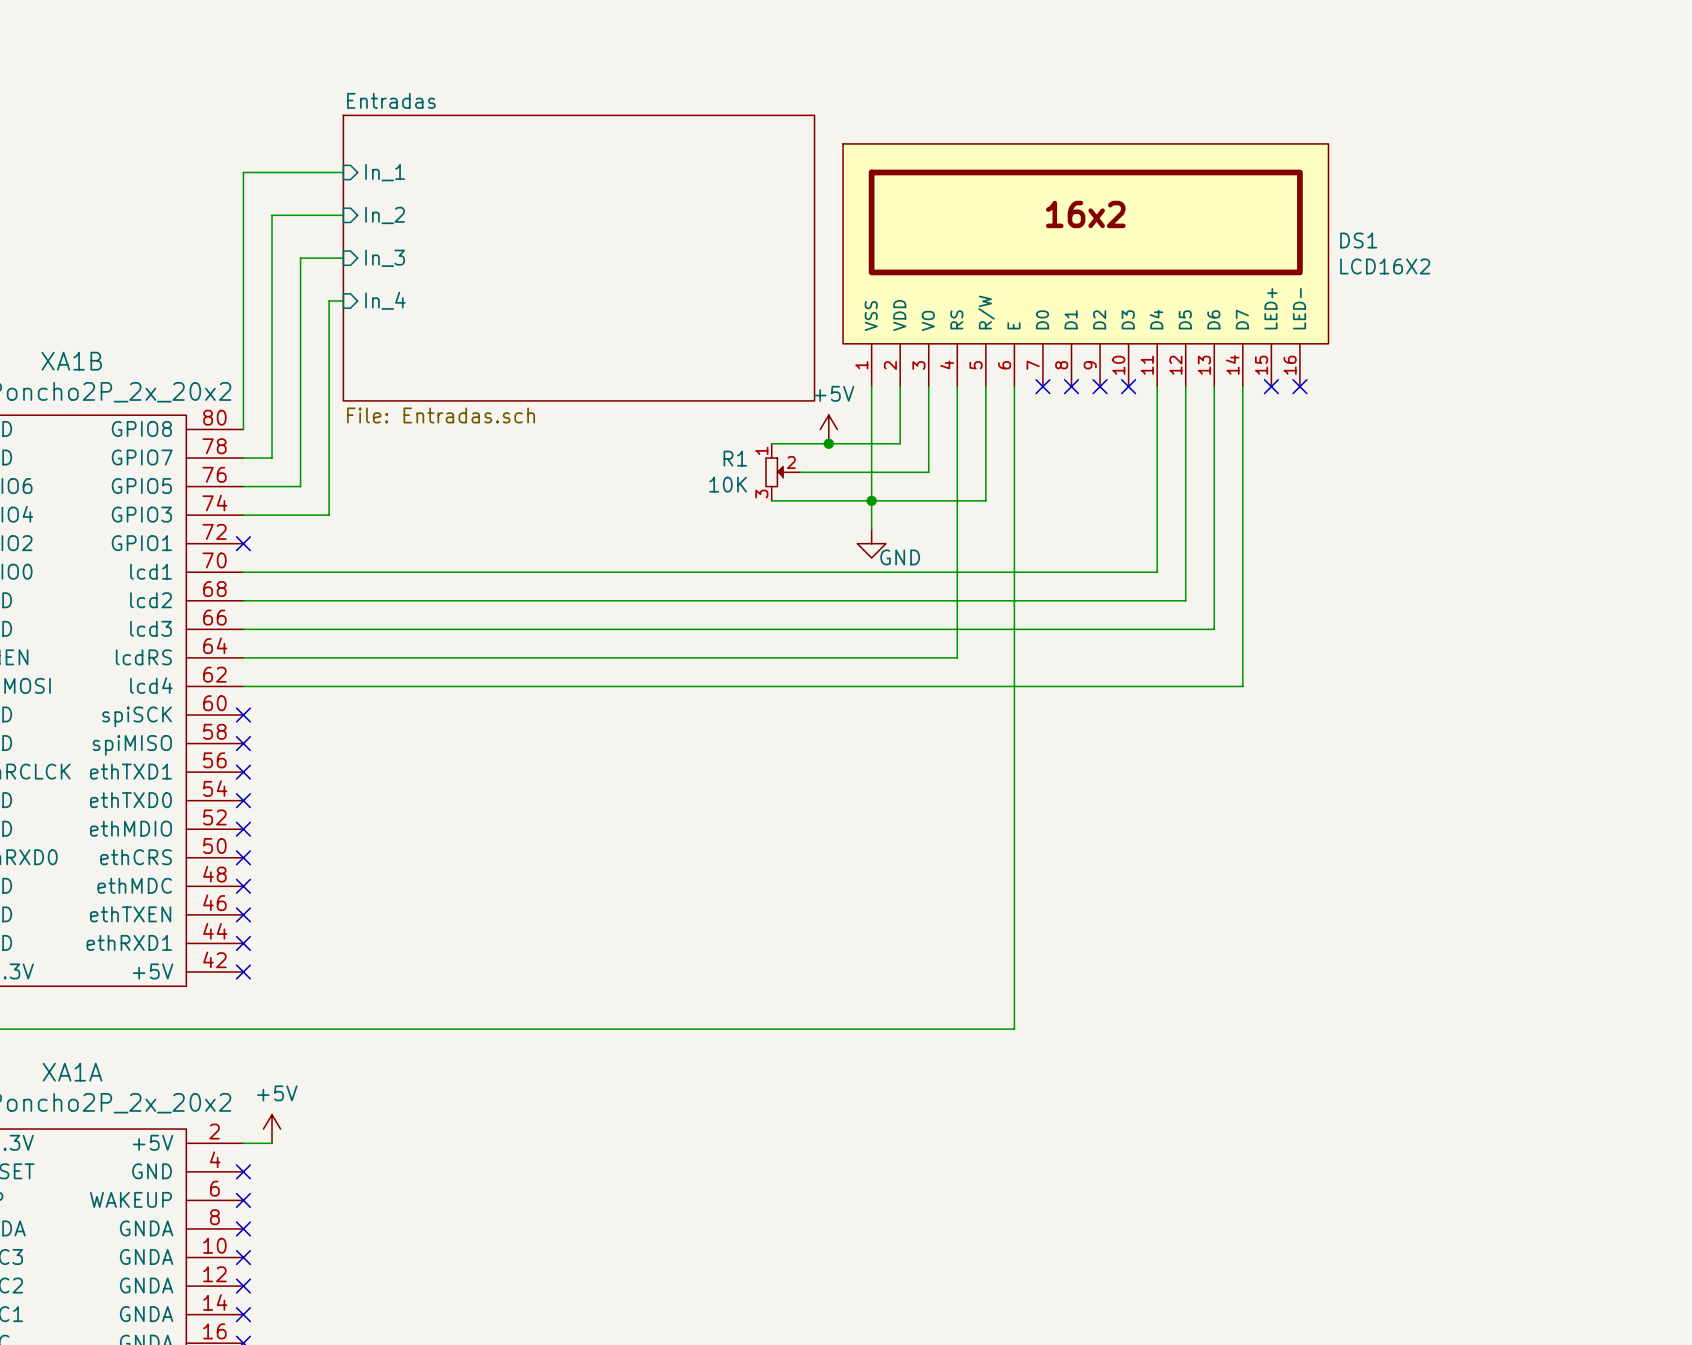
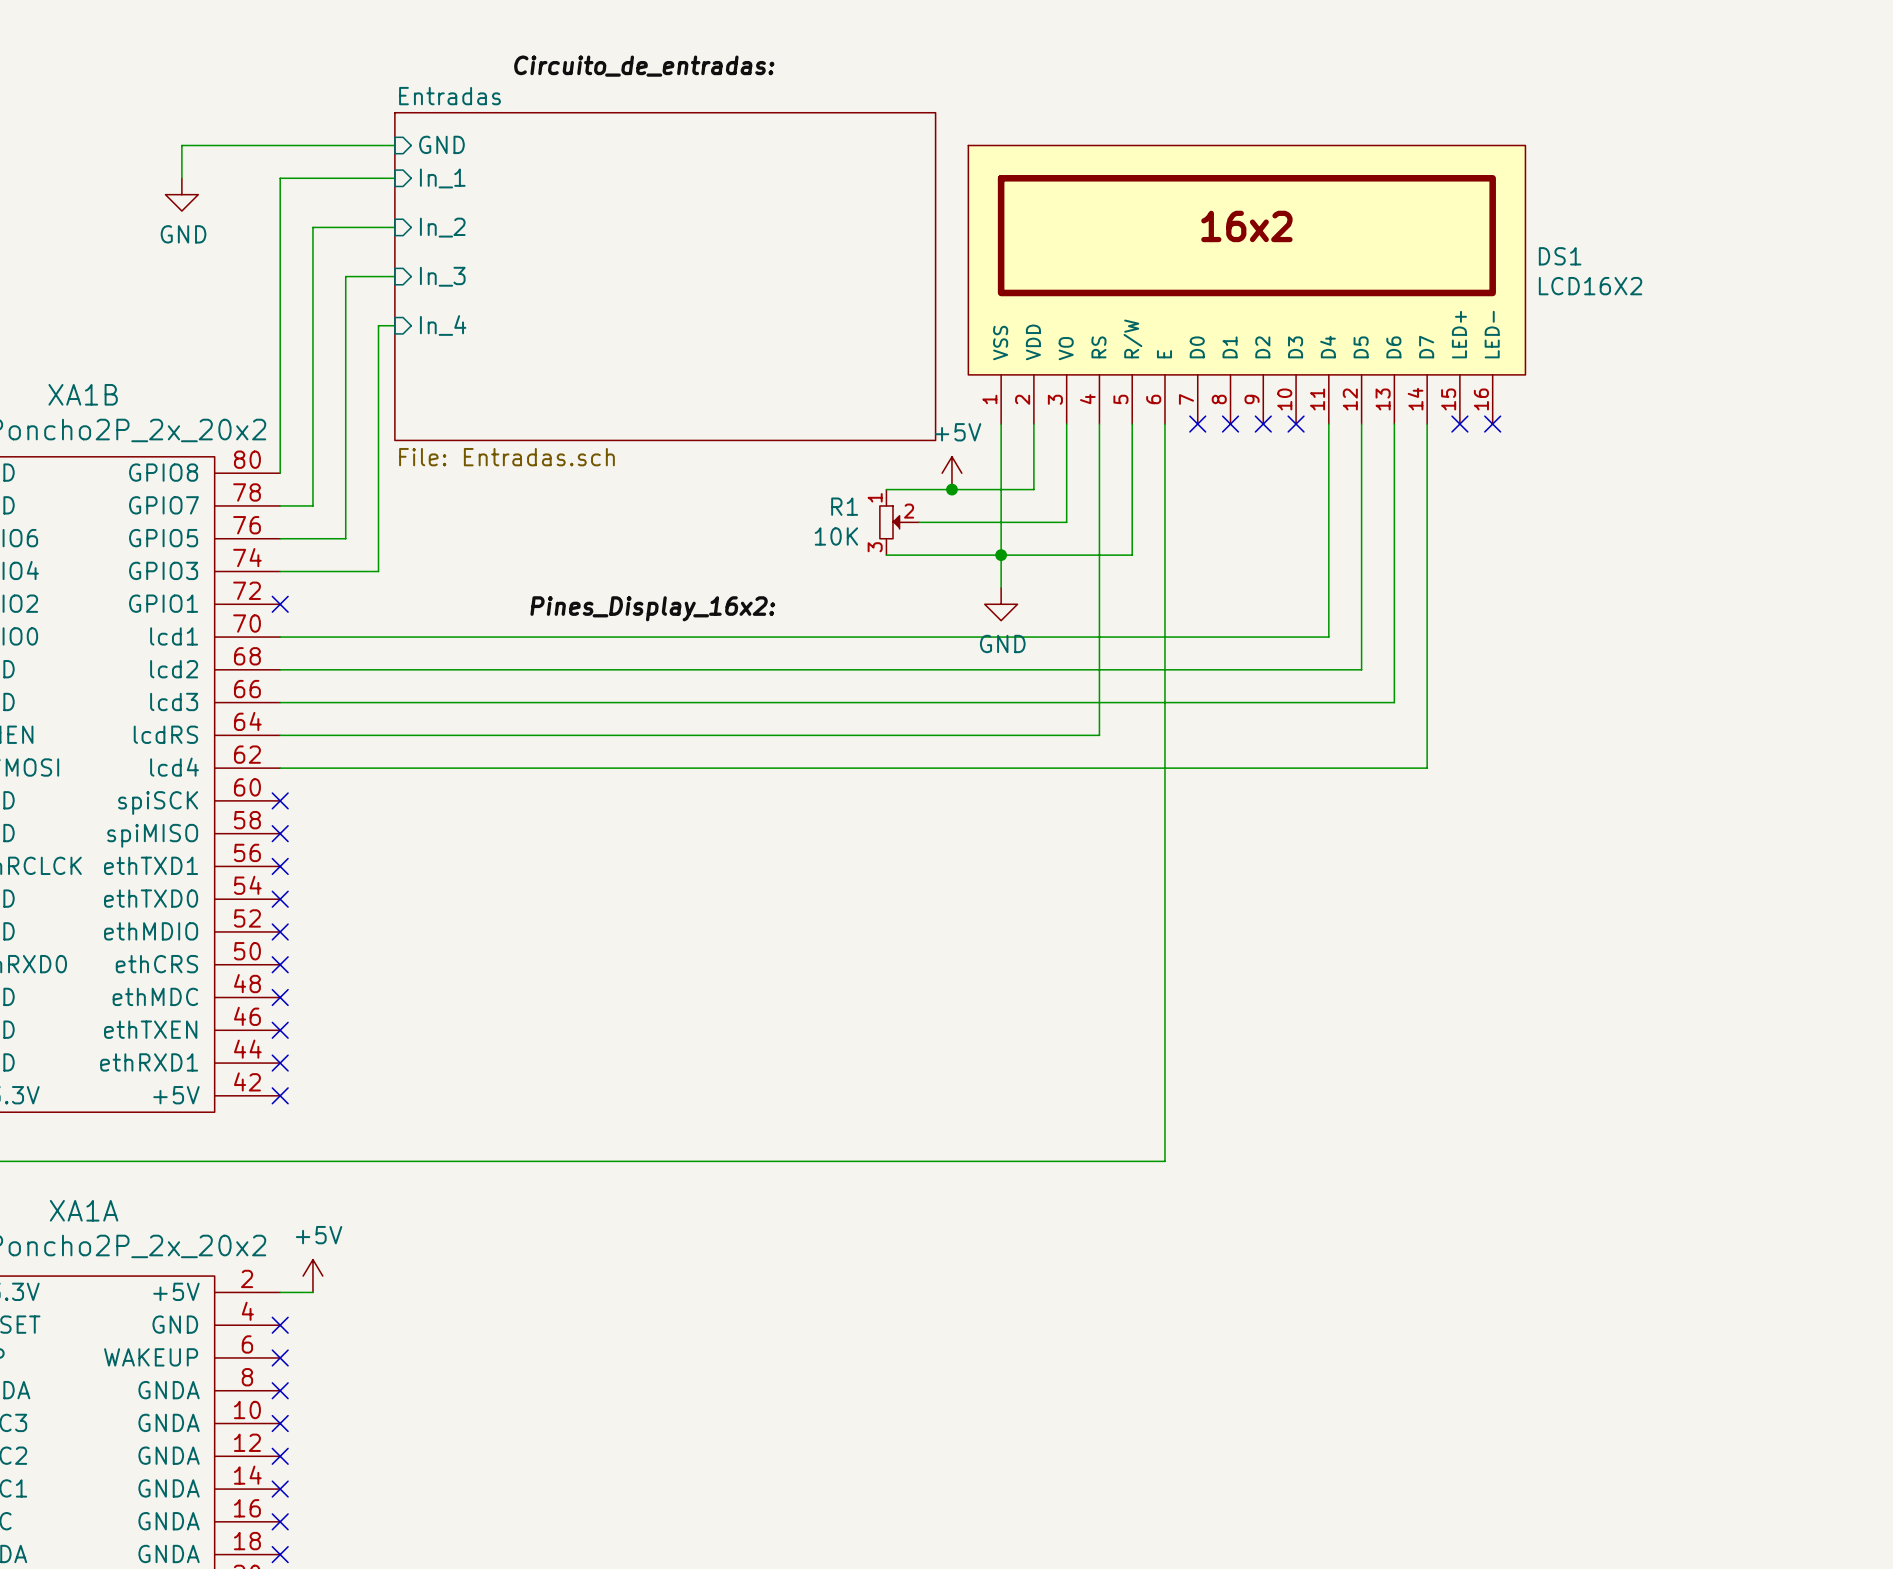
label: none -> Circuito_de_entradas: (644, 66)
wire: none -> (394, 145) (181, 145) (181, 178)
sheet pin: none -> GND (441, 144)
power symbol: none -> GND (181, 194)
label: none -> Pines_Display_16x2: (652, 608)
power symbol text position: GND (900, 557) -> GND (1002, 643)

